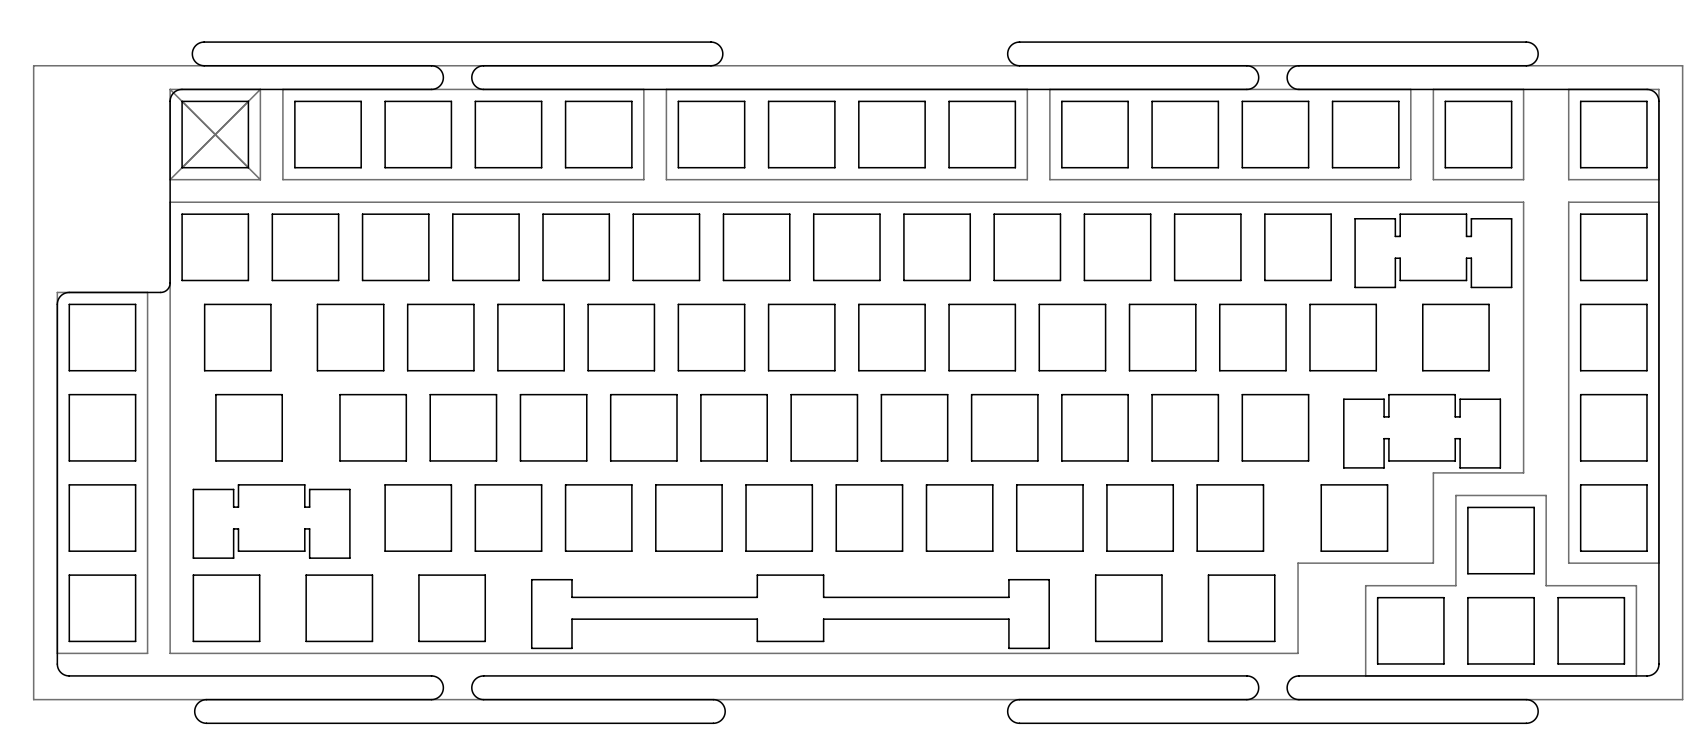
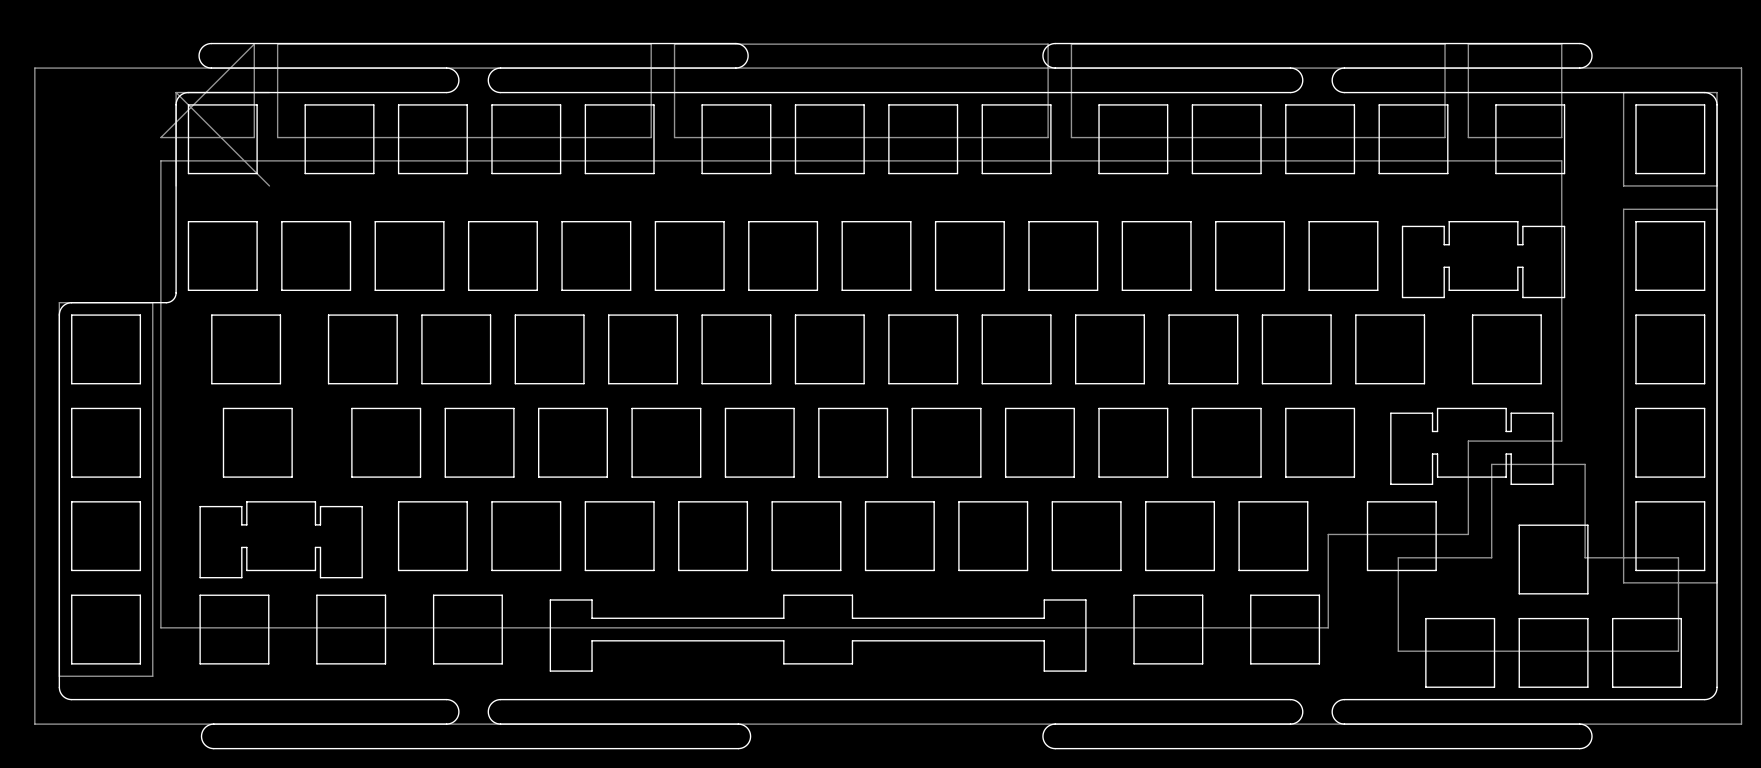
line: (260, 89) (170, 179) (260, 179) (260, 89) -> (254, 44) (160, 137) (254, 137) (254, 44)
line: (282, 89) (282, 179) (643, 179) (643, 89) (282, 89) -> (277, 44) (277, 137) (651, 137) (651, 44) (277, 44)
line: (666, 89) (1027, 89) (1027, 179) (666, 179) (666, 89) -> (674, 44) (1048, 44) (1048, 137) (674, 137) (674, 44)
line: (1049, 89) (1410, 89) (1410, 179) (1049, 179) (1049, 89) -> (1071, 44) (1445, 44) (1445, 137) (1071, 137) (1071, 44)
line: (1433, 89) (1523, 89) (1523, 179) (1433, 179) (1433, 89) -> (1468, 44) (1561, 44) (1561, 137) (1468, 137) (1468, 44)
line: (170, 202) (170, 653) (1298, 653) (1298, 563) (1433, 563) (1433, 472) (1523, 472) (1523, 202) (170, 202) -> (160, 160) (160, 627) (1328, 627) (1328, 534) (1468, 534) (1468, 441) (1561, 441) (1561, 160) (160, 160)
line: (1455, 495) (1546, 495) (1546, 585) (1636, 585) (1636, 675) (1365, 675) (1365, 585) (1455, 585) (1455, 495) -> (1491, 464) (1585, 464) (1585, 557) (1678, 557) (1678, 651) (1398, 651) (1398, 557) (1491, 557) (1491, 464)

